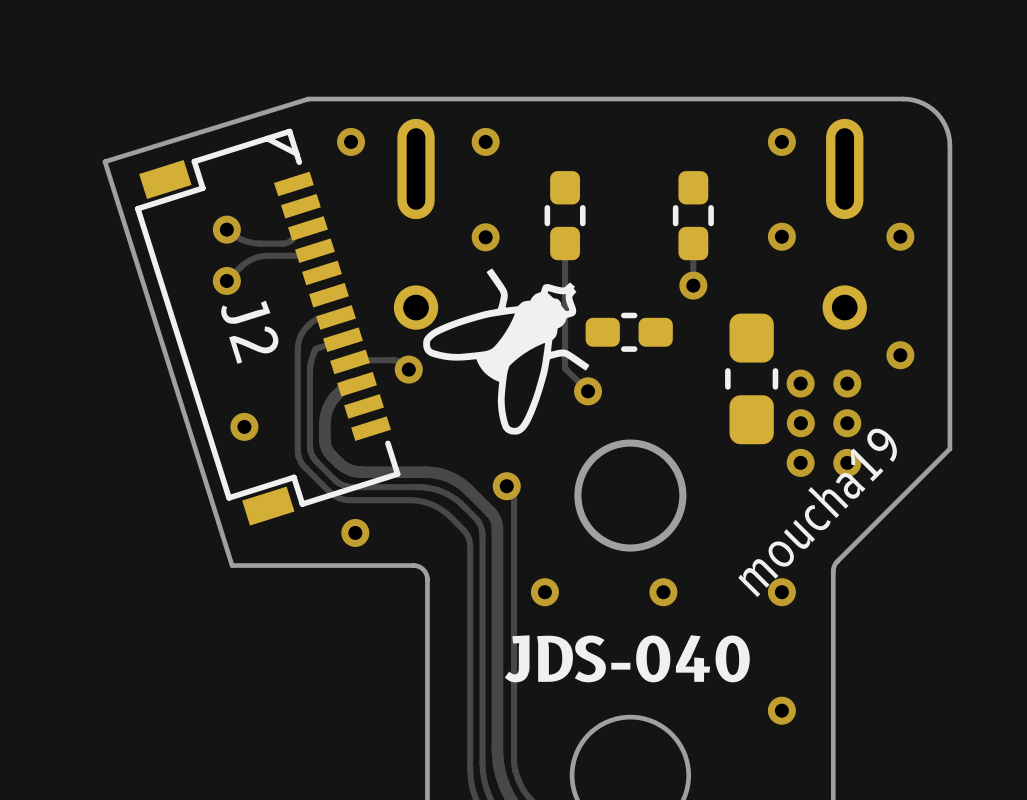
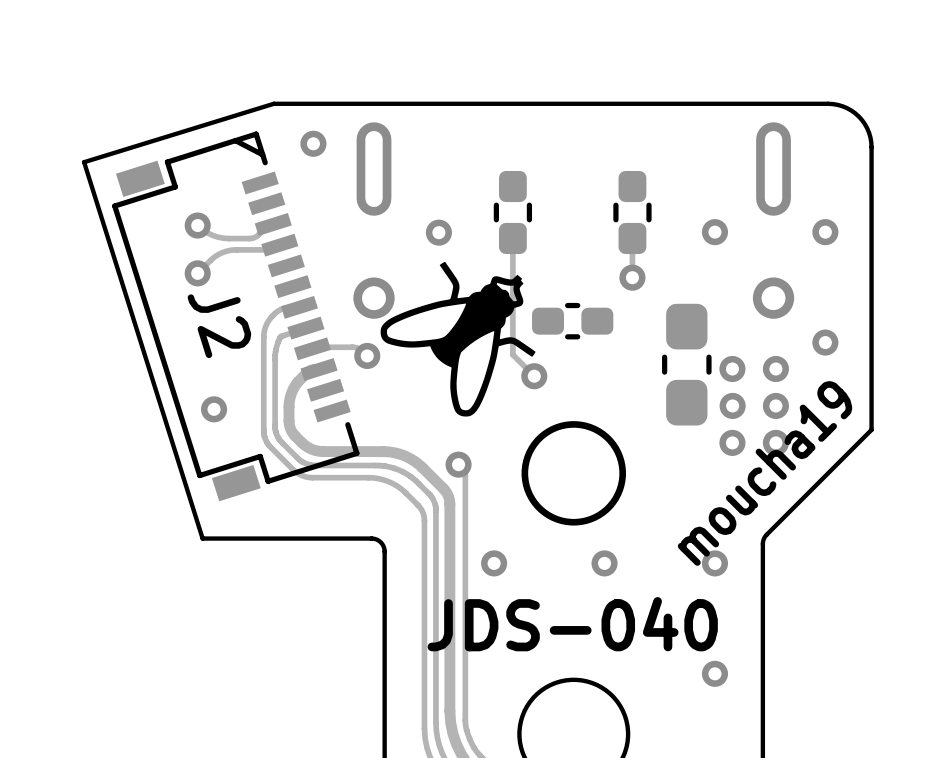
via: (485, 141) -> none
via: (781, 141) -> none
via: (355, 532) -> none

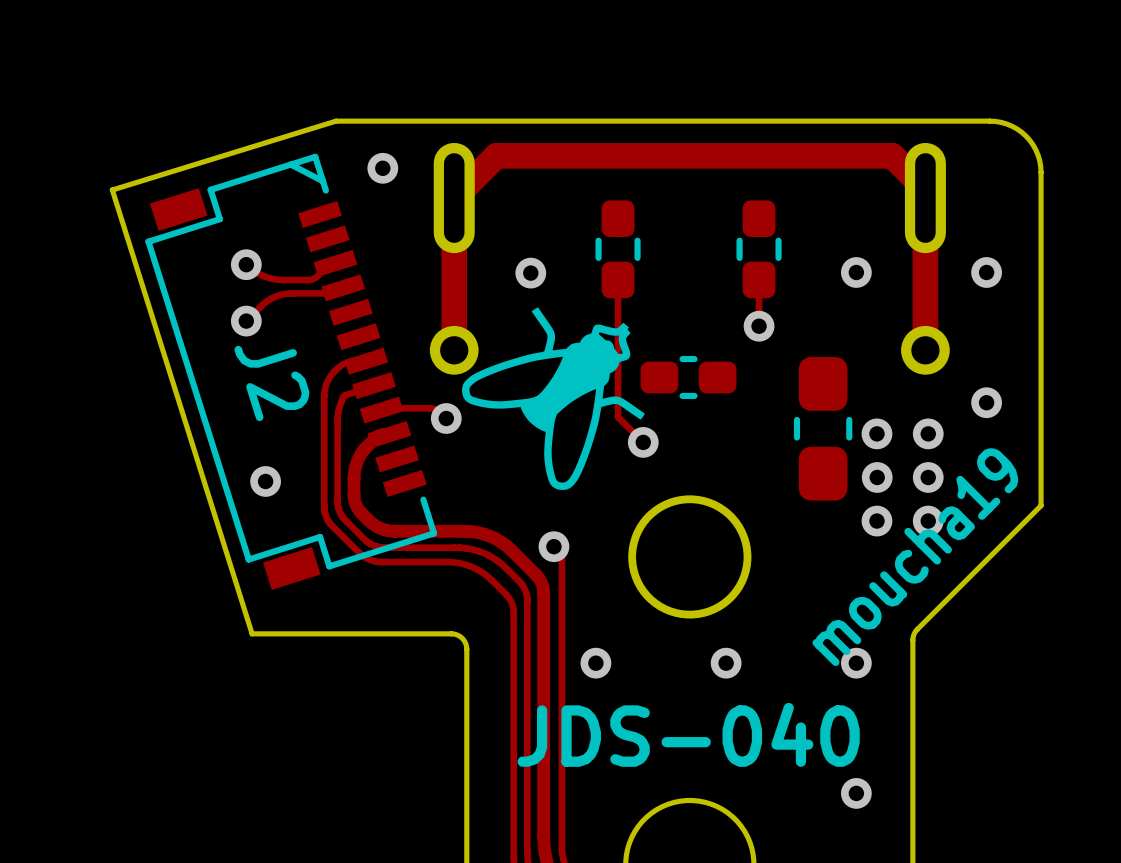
track: none -> (454, 188) (454, 350)
track: none -> (454, 198) (496, 155) (892, 155) (925, 188) (925, 350)

